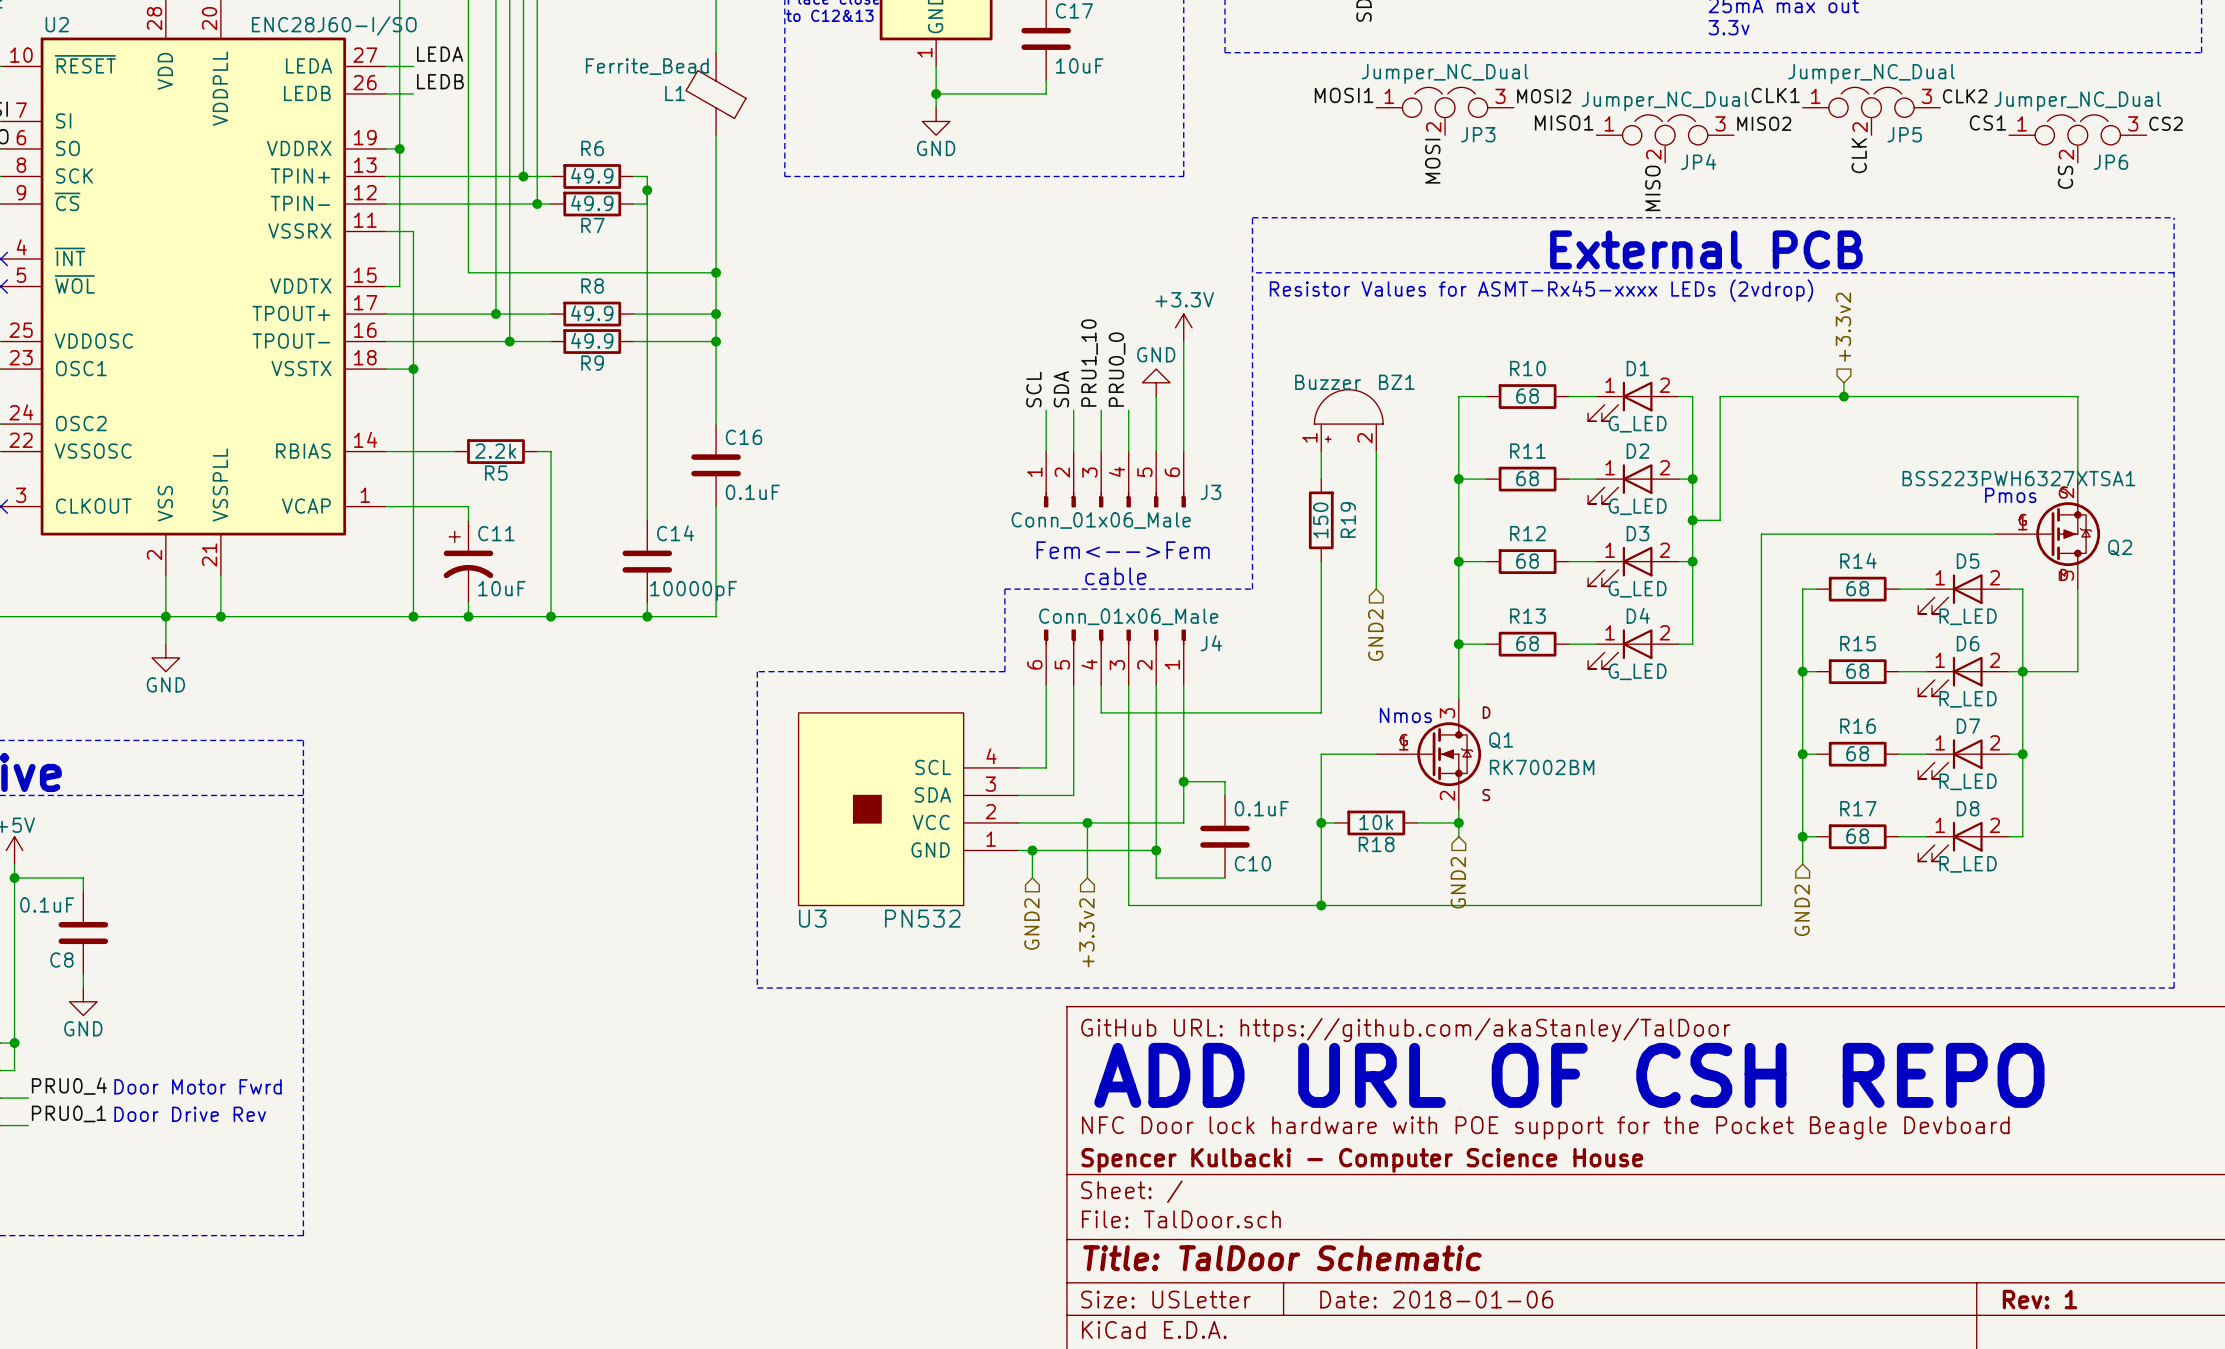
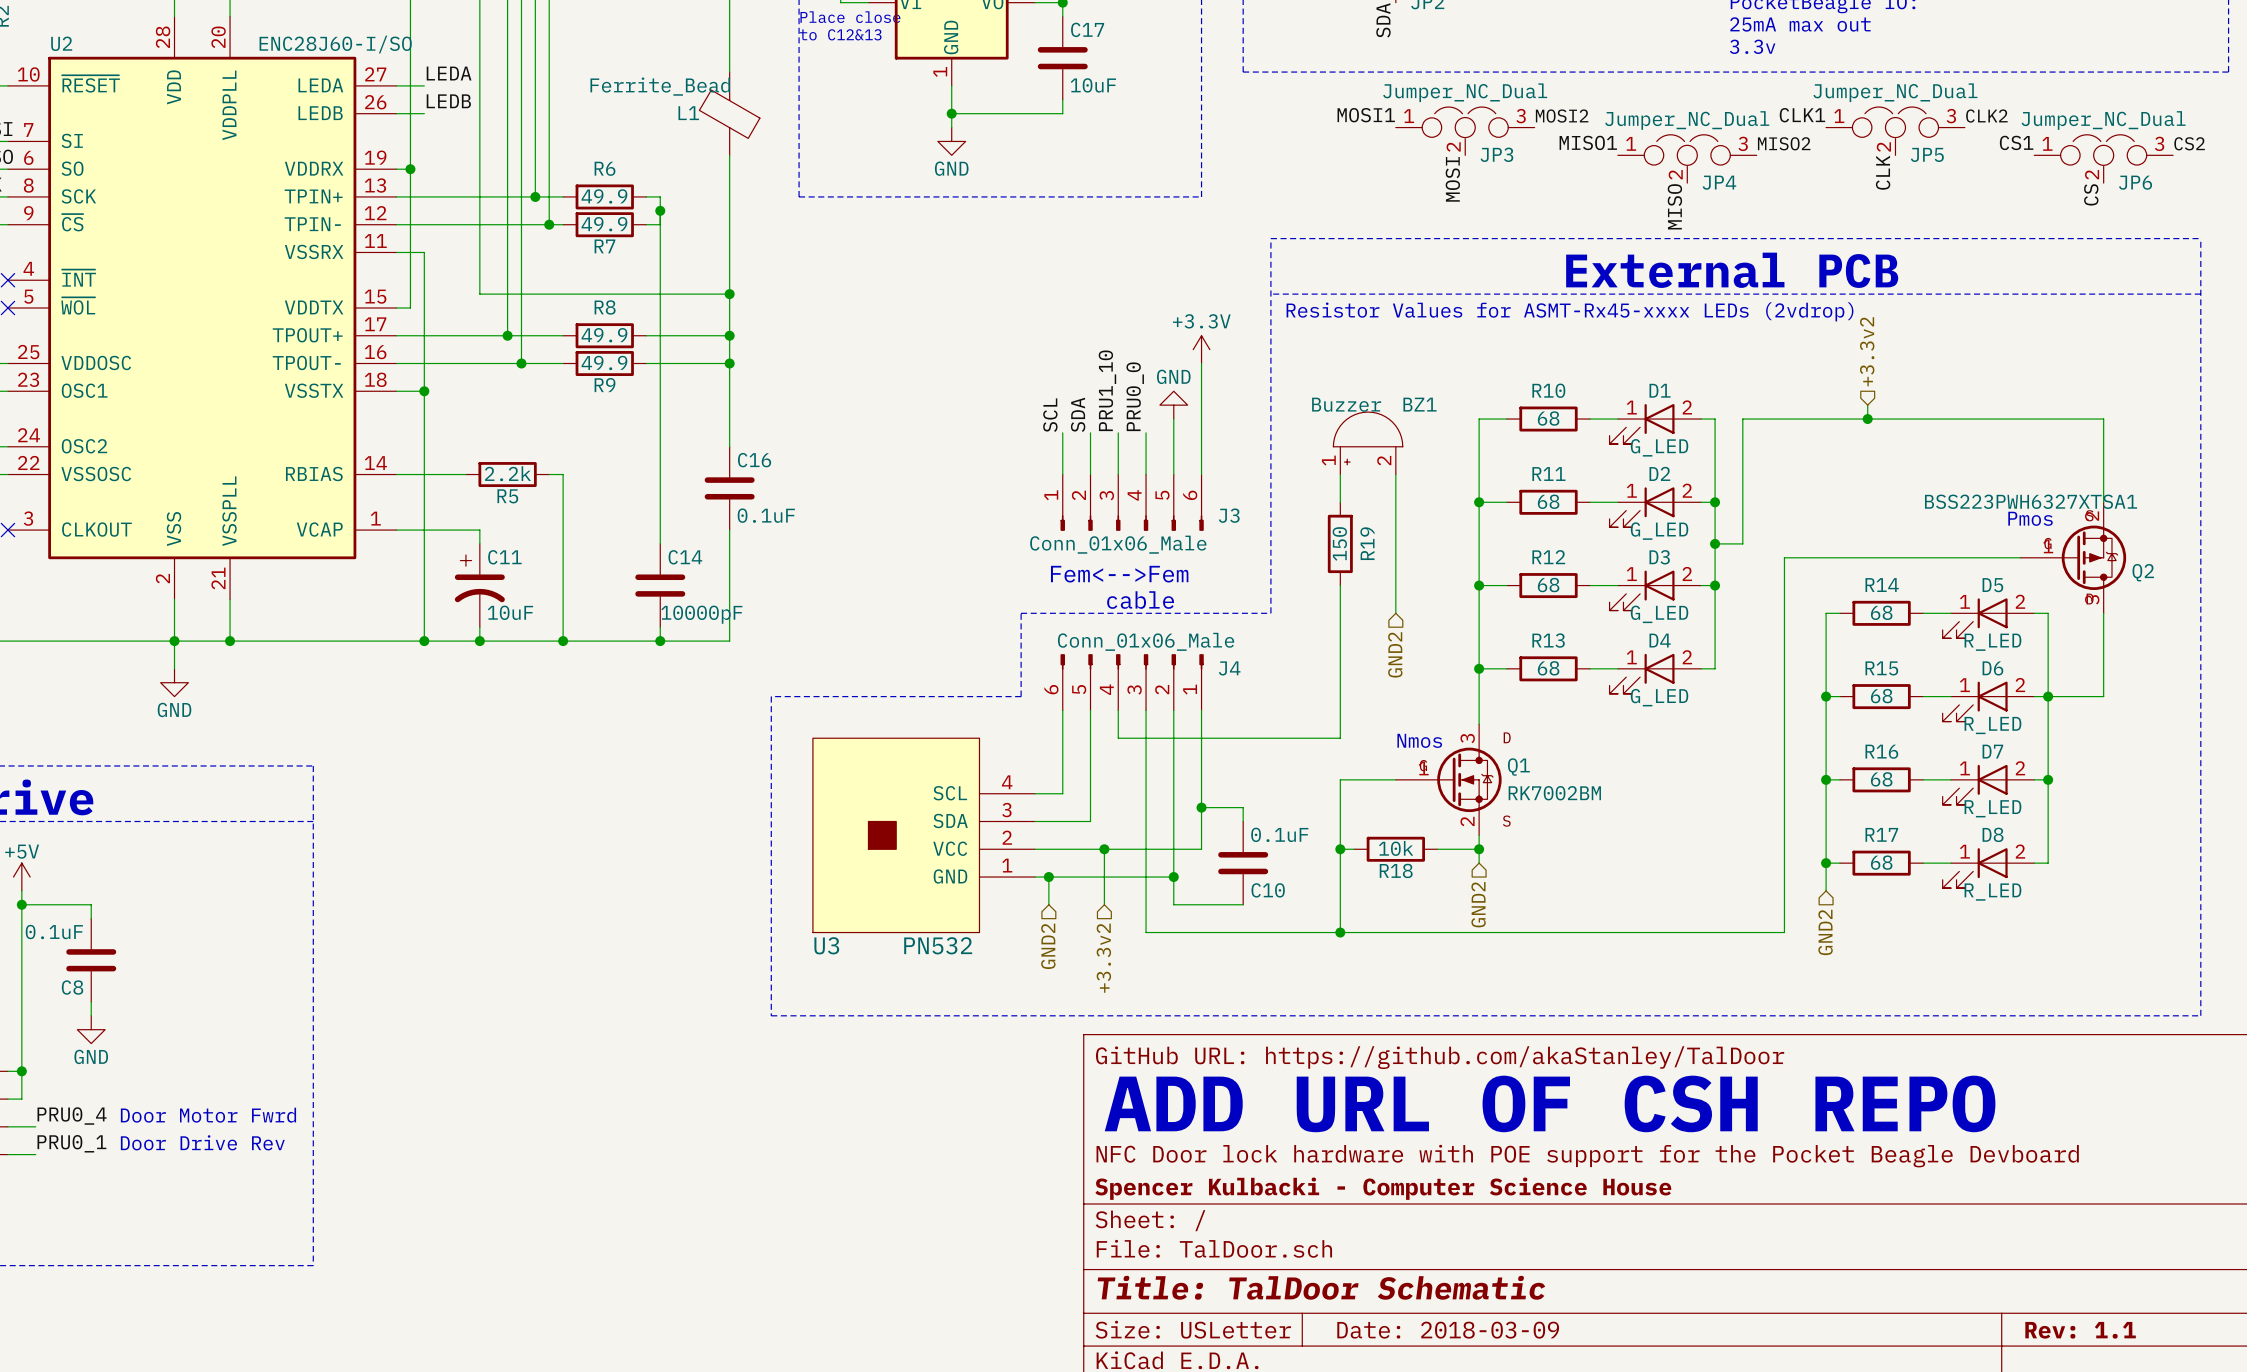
title block: Date: 2018-01-06 (1436, 1299) -> Date: 2018-03-09 (1448, 1330)
title block: Rev: 1 (2039, 1299) -> Rev: 1.1 (2080, 1330)

